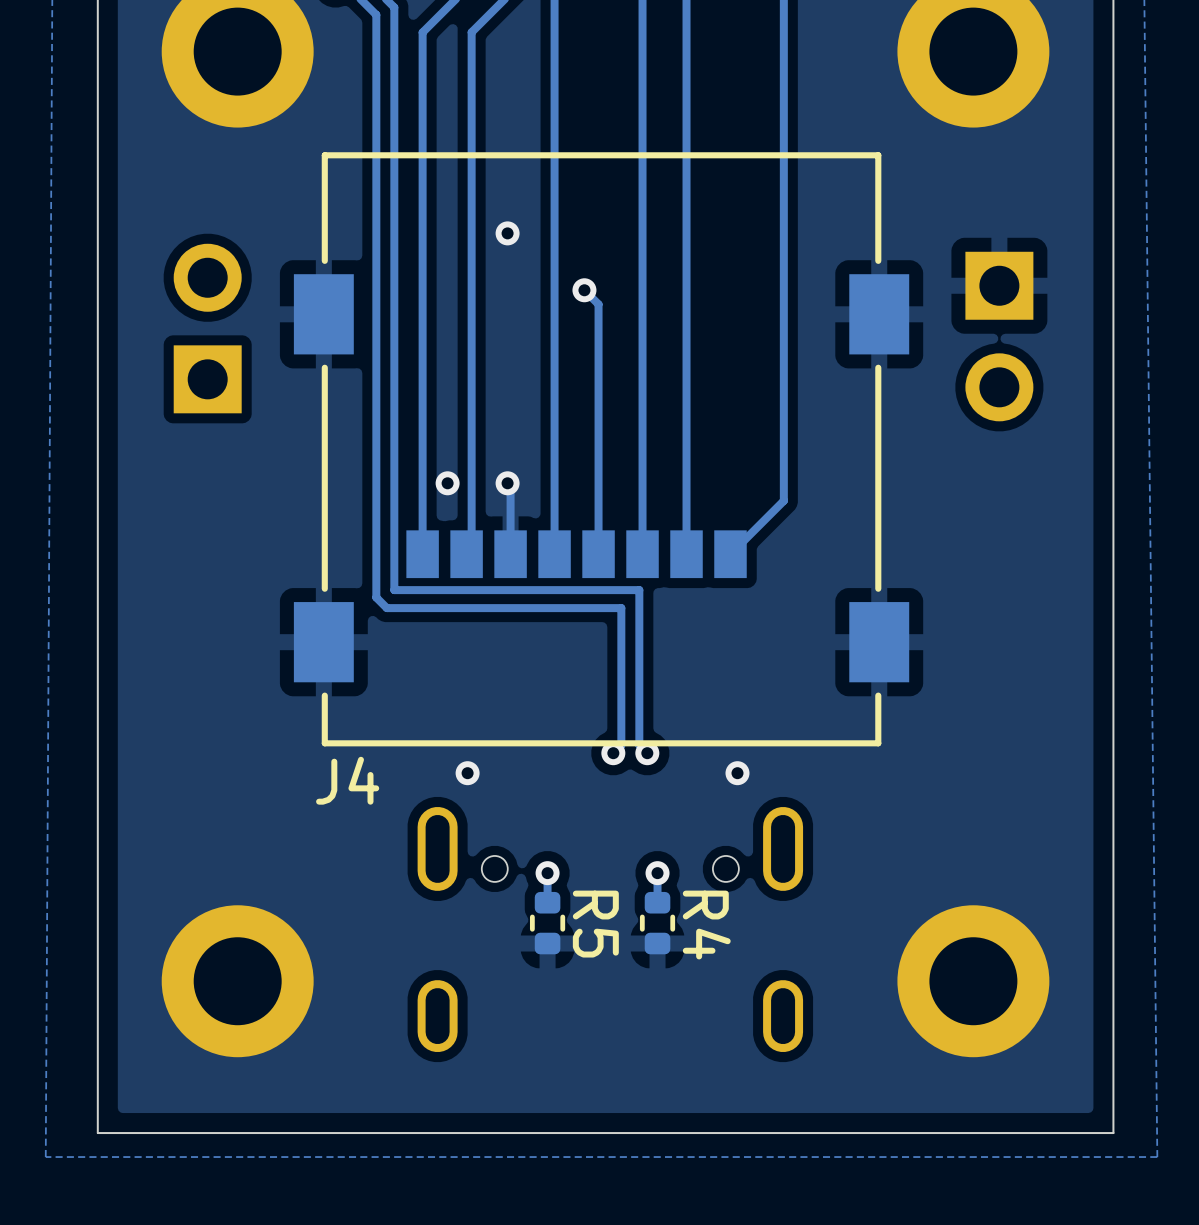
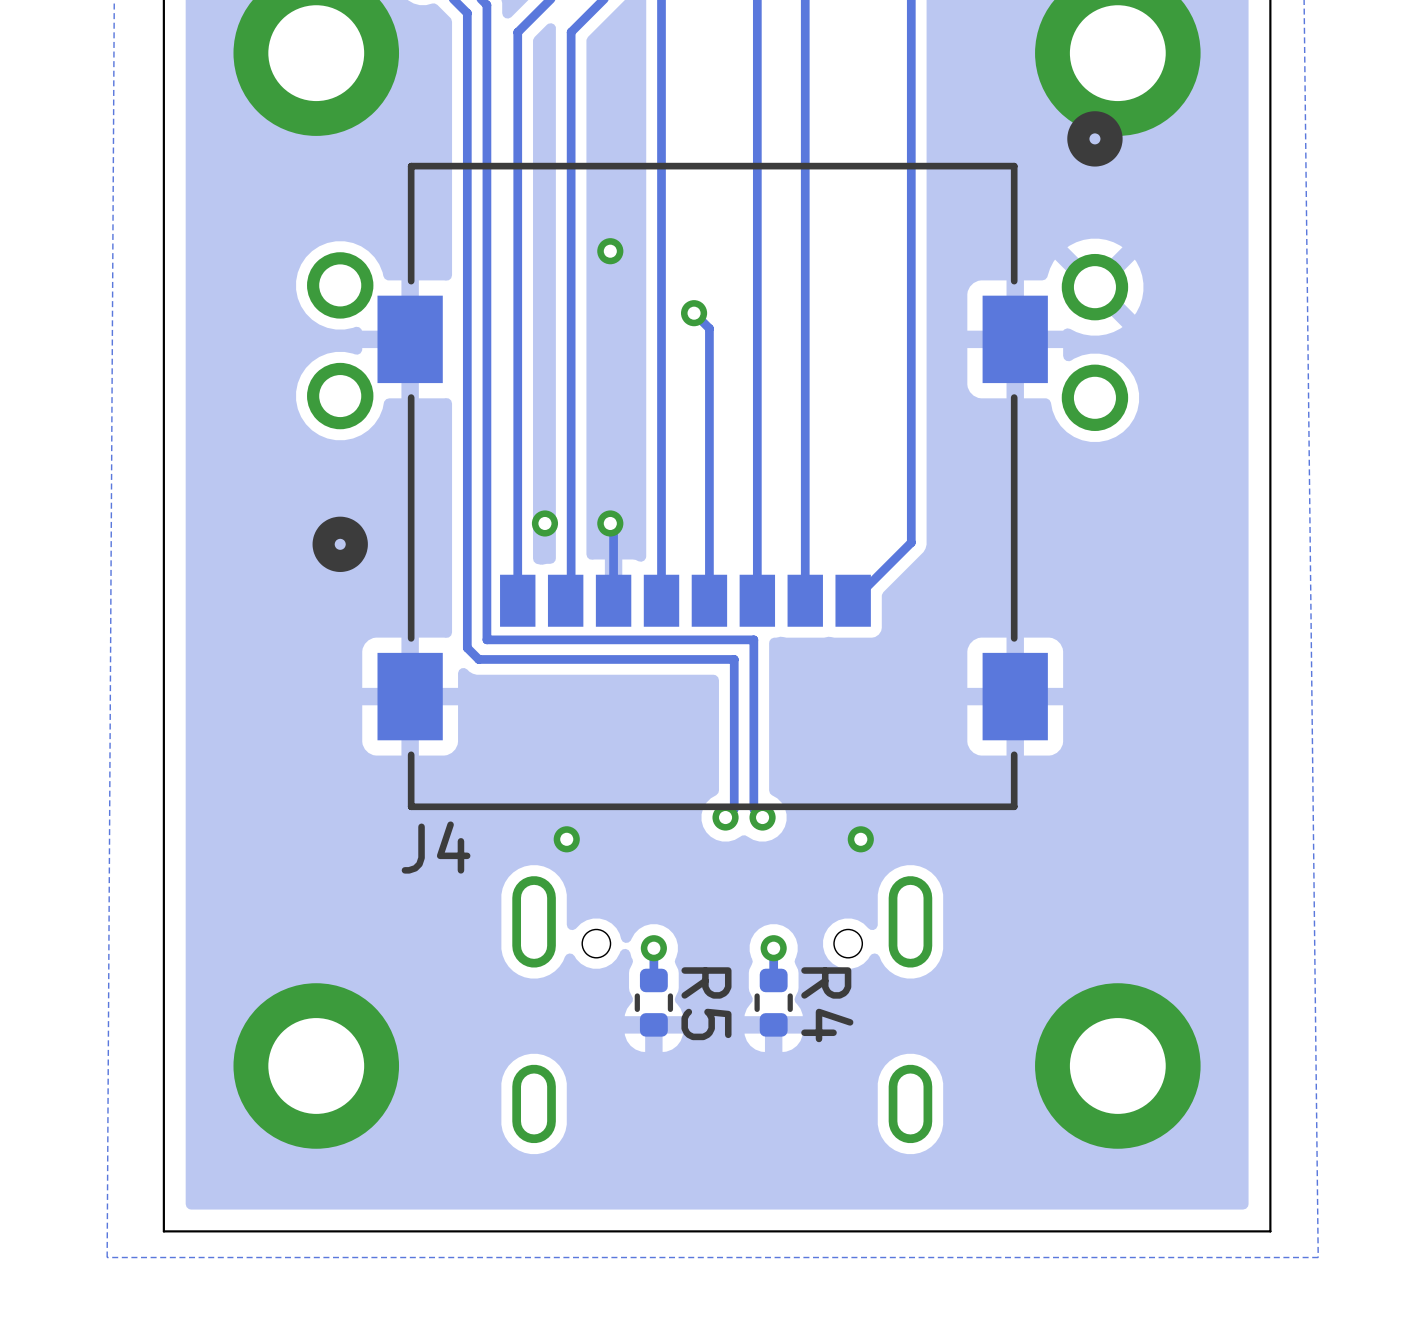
part: none -> (1094, 271)
part: (207, 328) -> none
part: (999, 336) -> none
part: none -> (340, 412)

